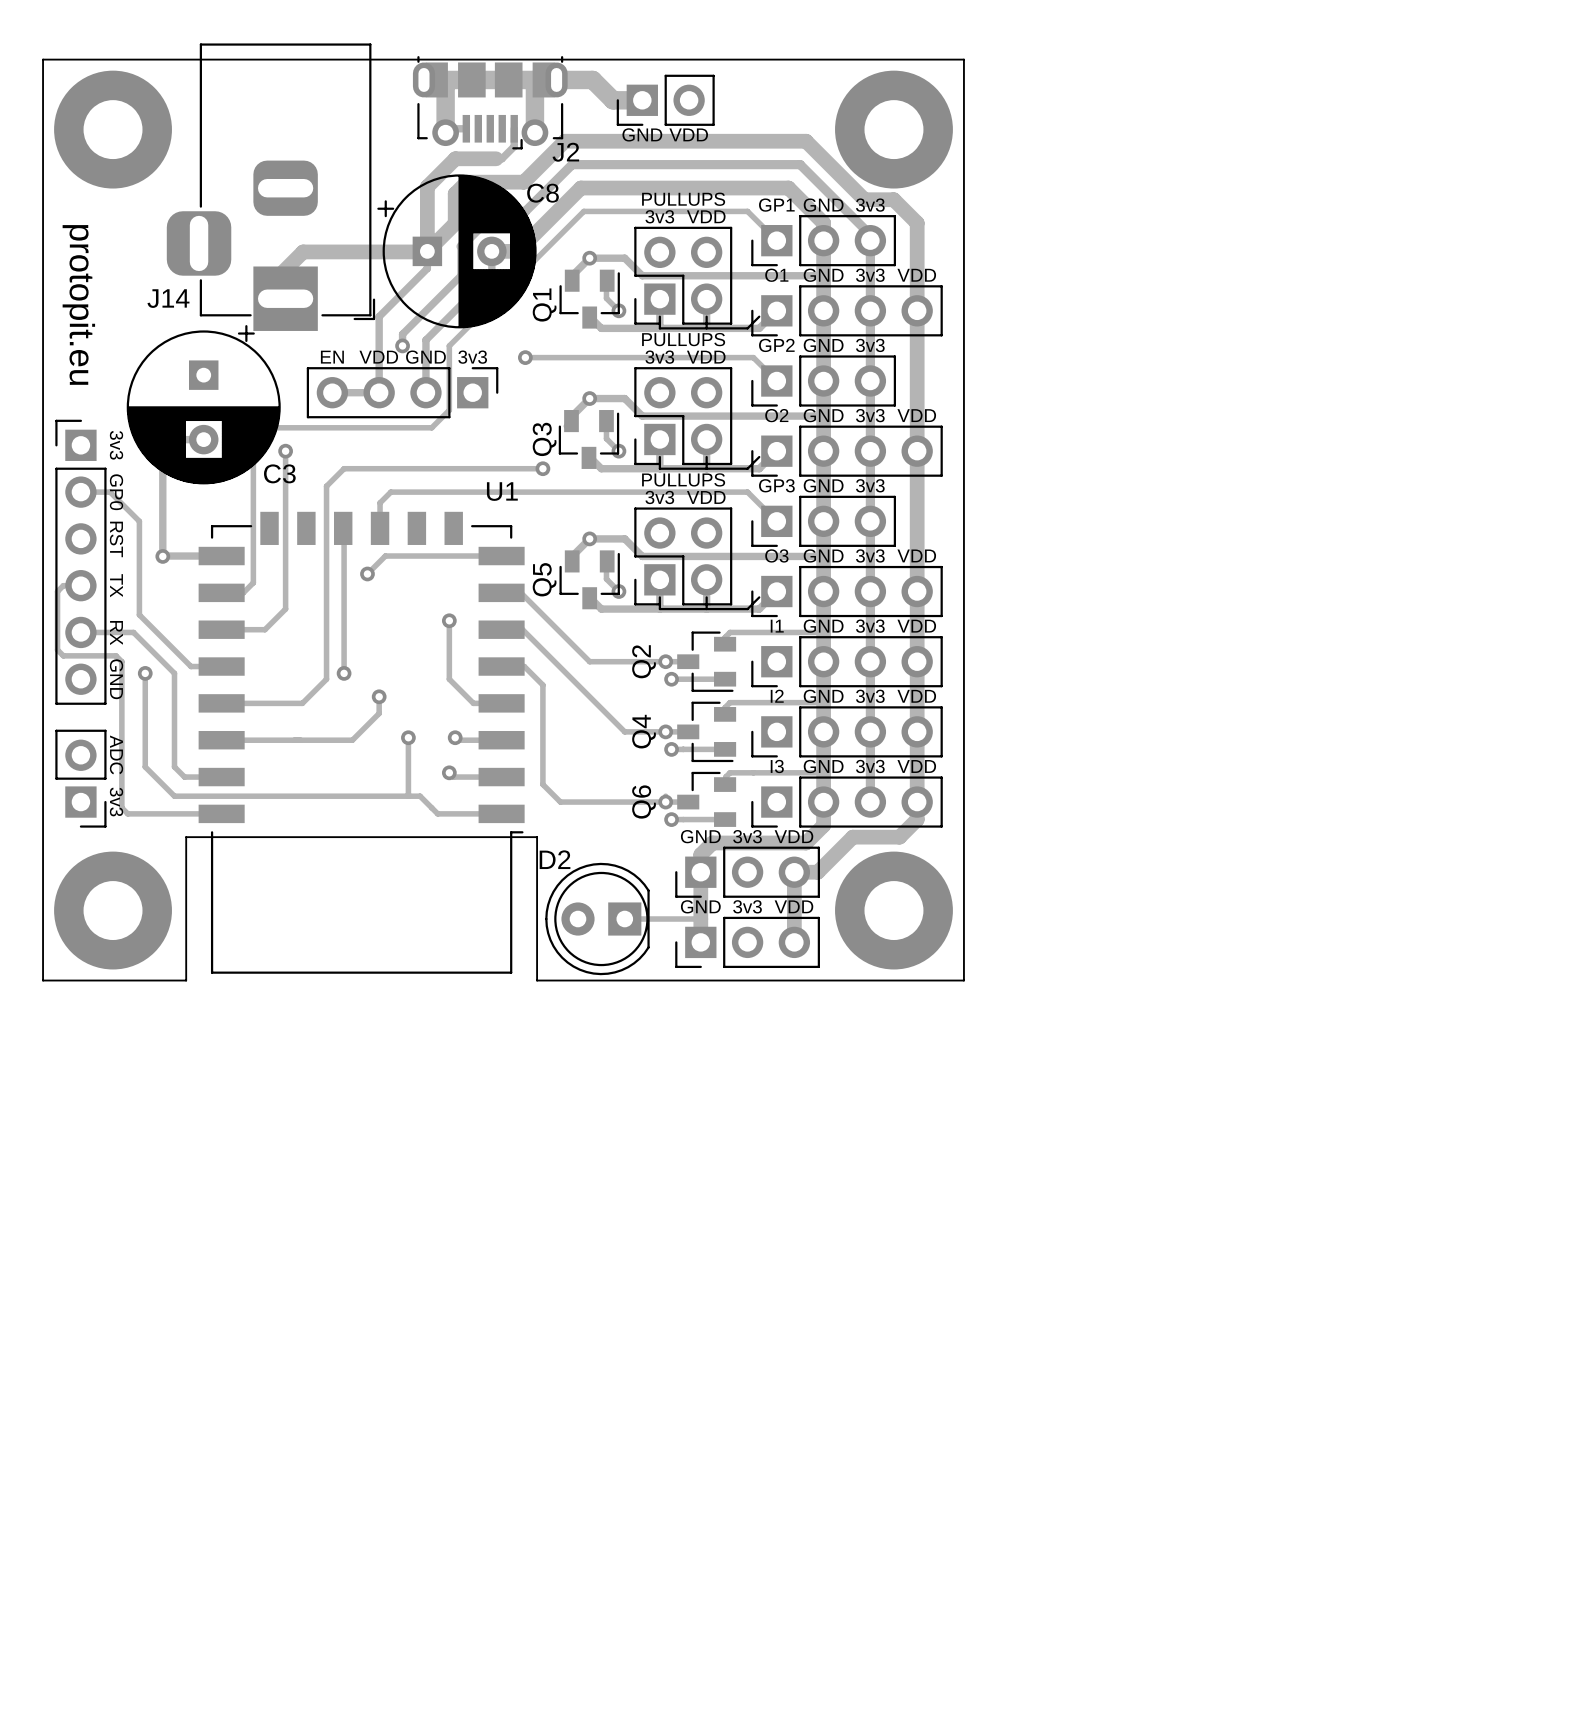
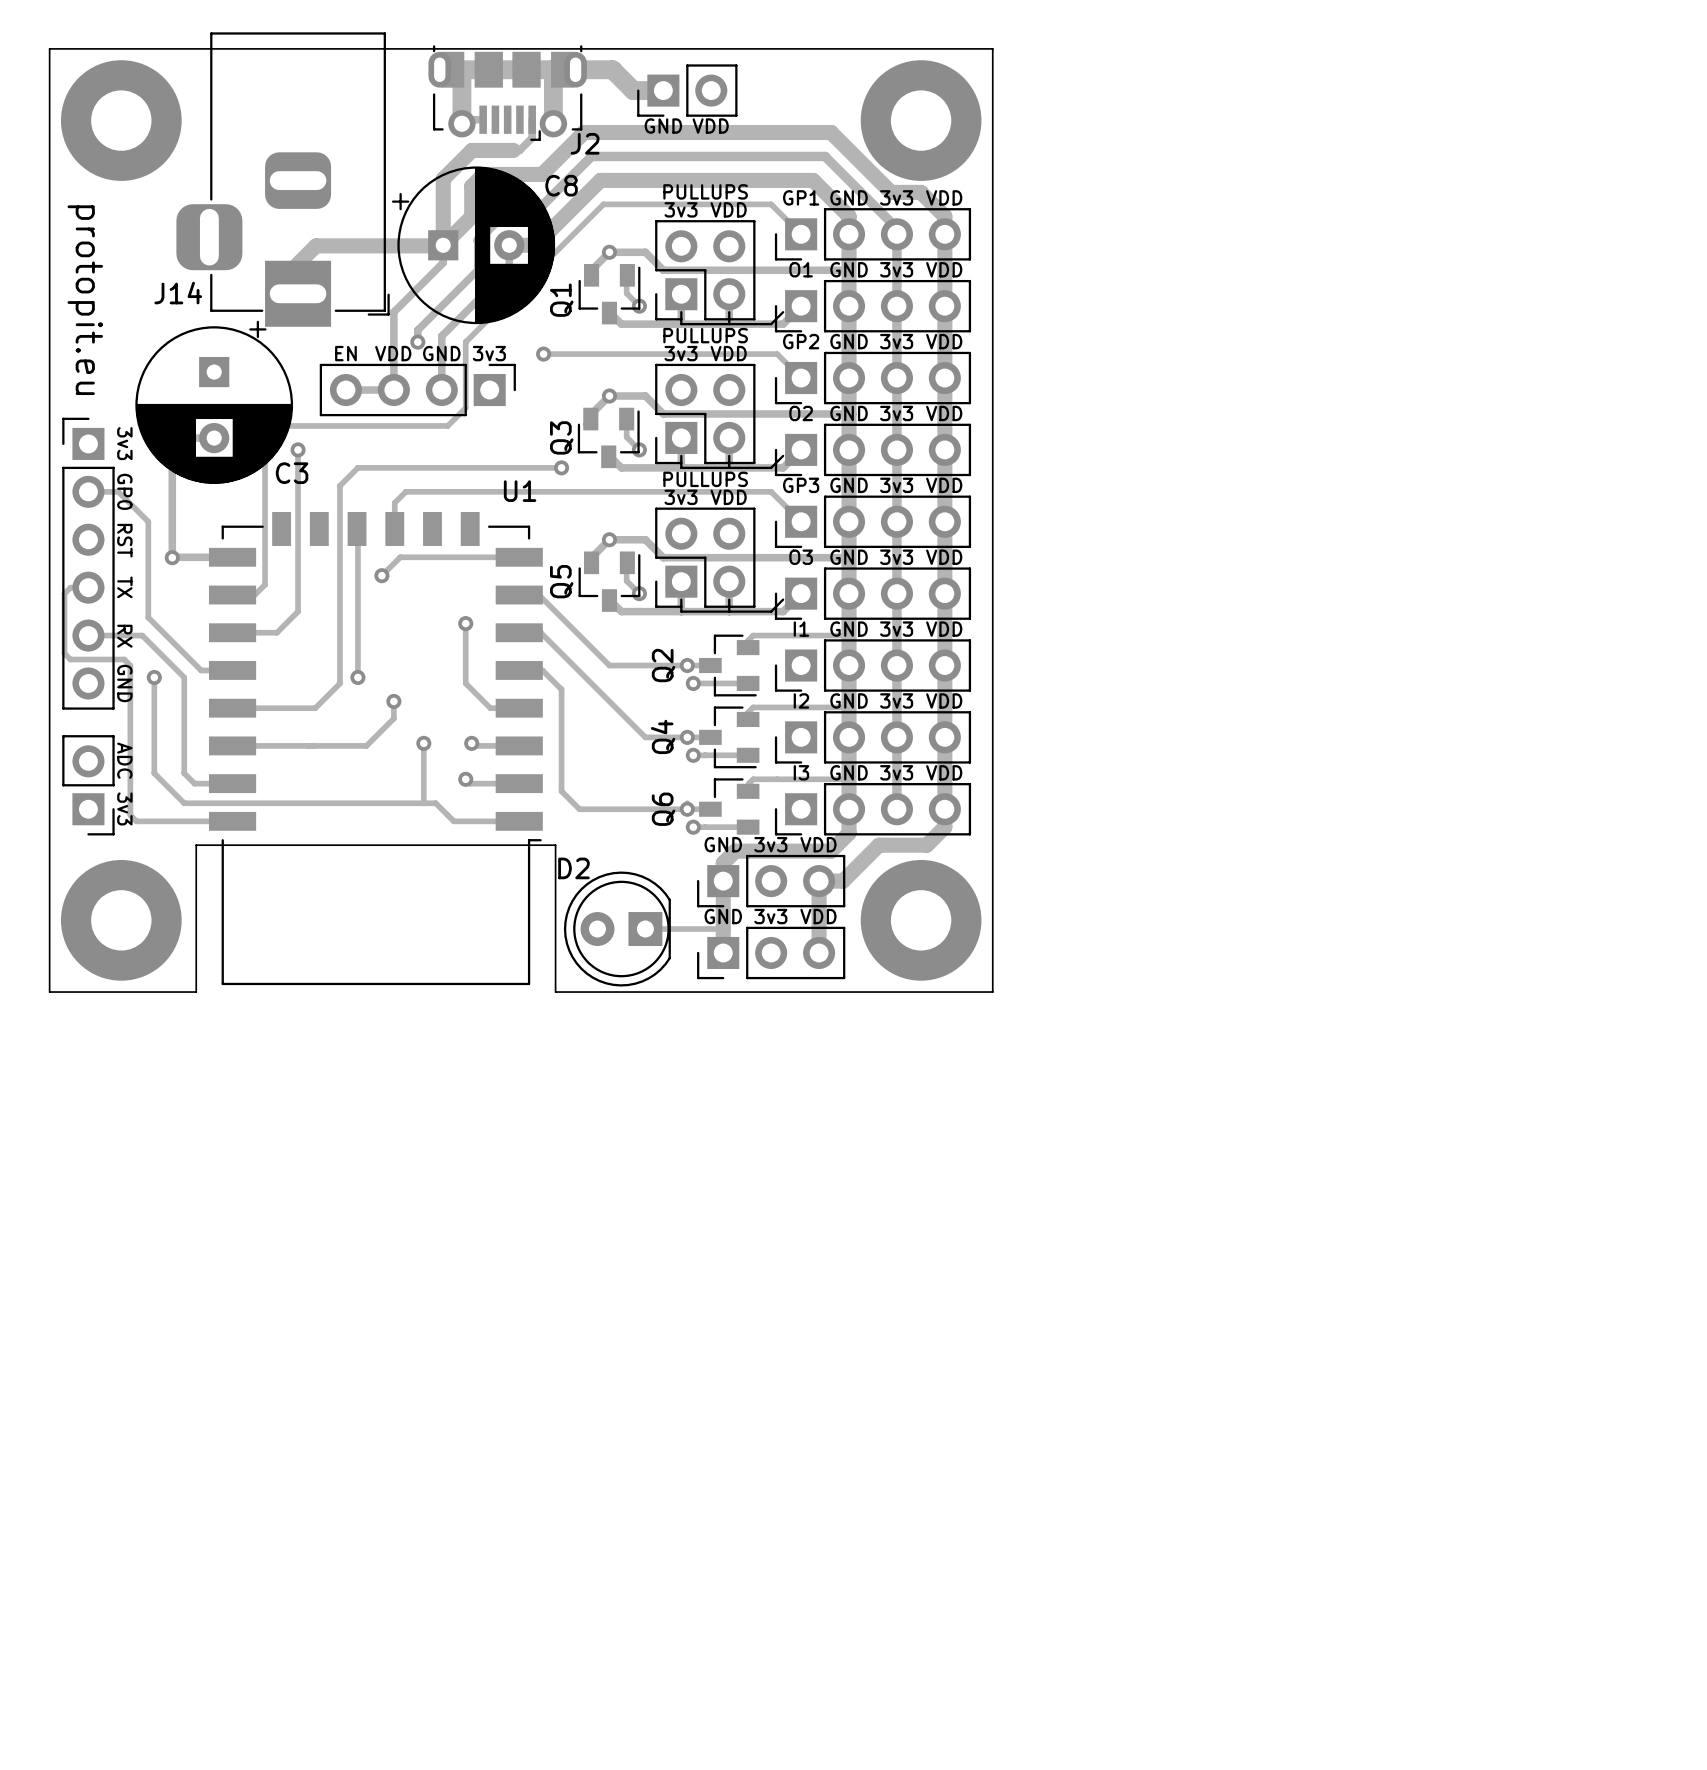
text: none -> VDD (944, 197)
part: (823, 240) -> none
part: none -> (872, 234)
text: none -> VDD (944, 341)
part: (823, 381) -> none
part: none -> (872, 378)
text: none -> VDD (944, 485)
part: (823, 521) -> none
part: none -> (872, 521)

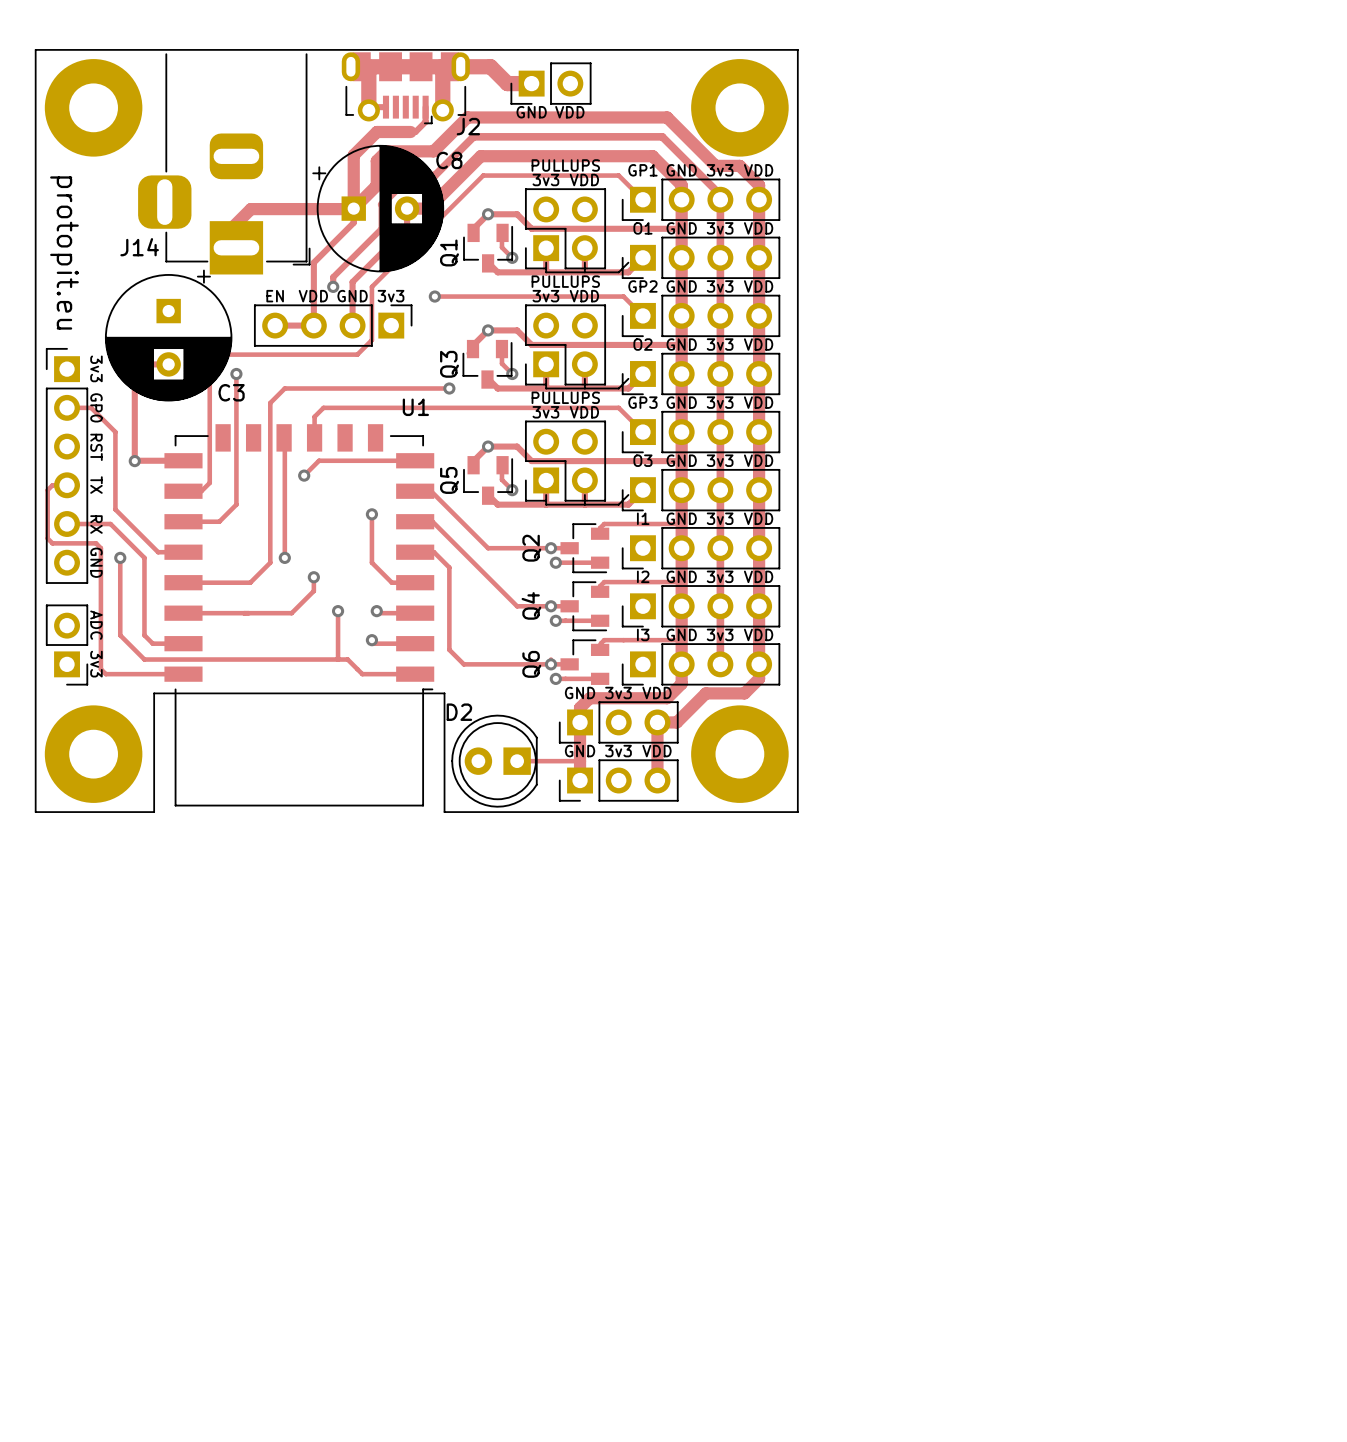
J14 footprint: [176, 32, 390, 327] -> [138, 53, 311, 275]
J2 footprint: [428, 45, 587, 141] -> [341, 52, 470, 125]

